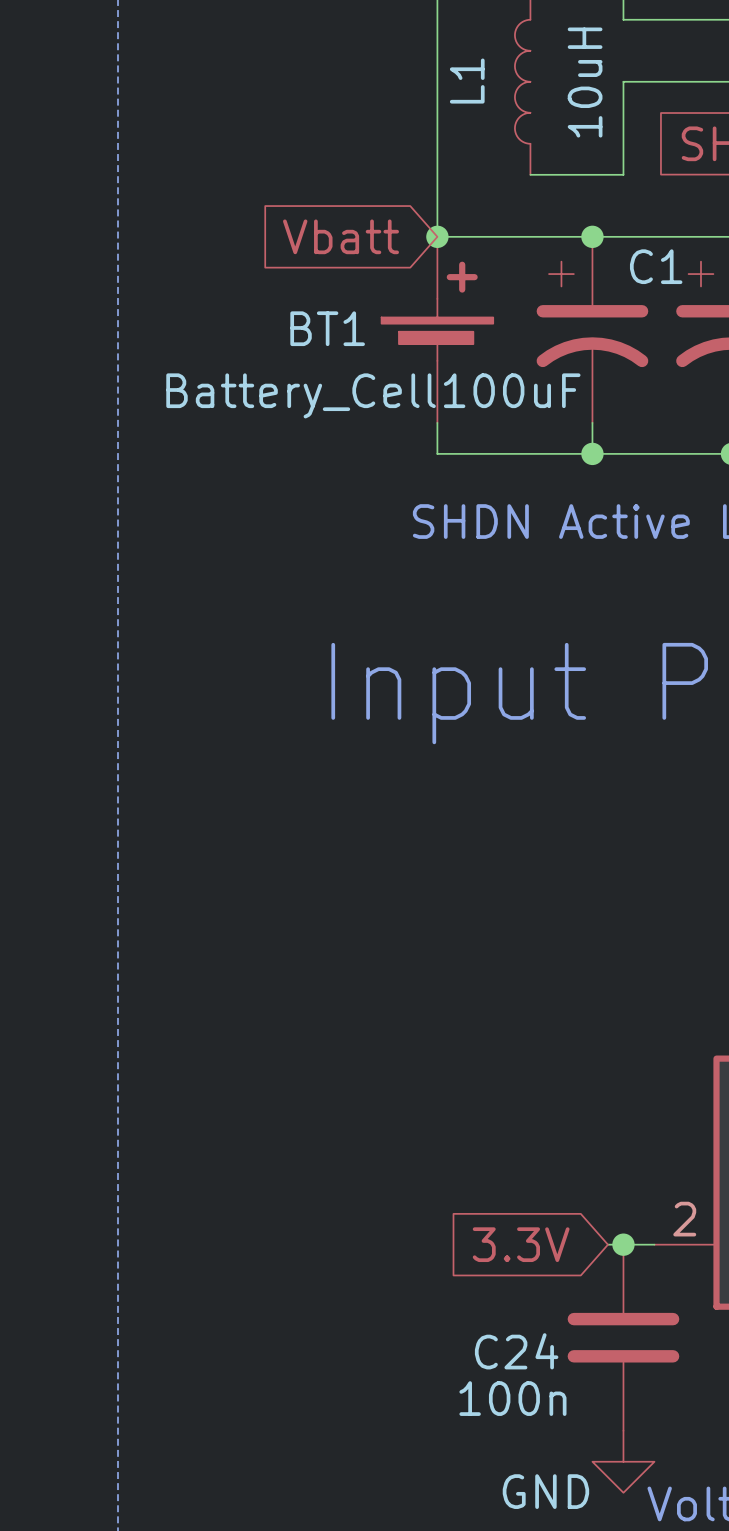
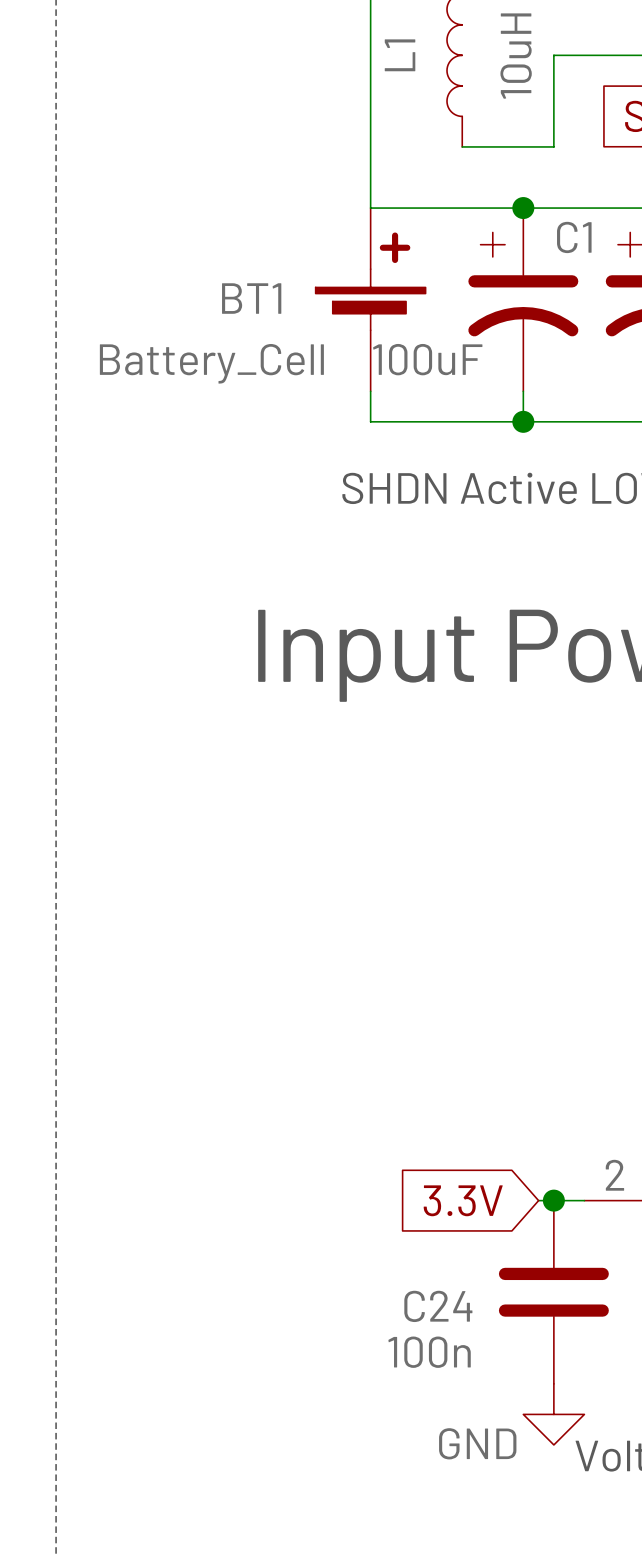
global label: Vbatt (341, 236) -> none
junction: (437, 236) -> none

